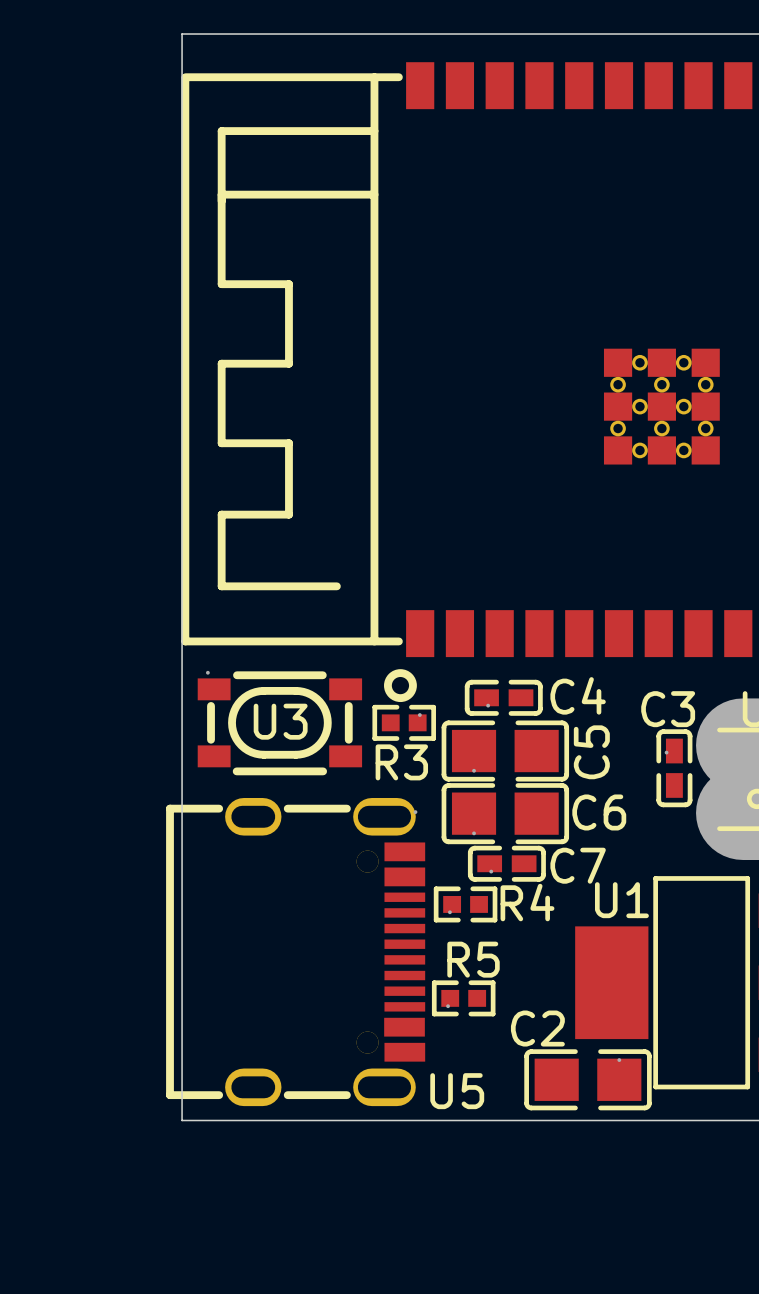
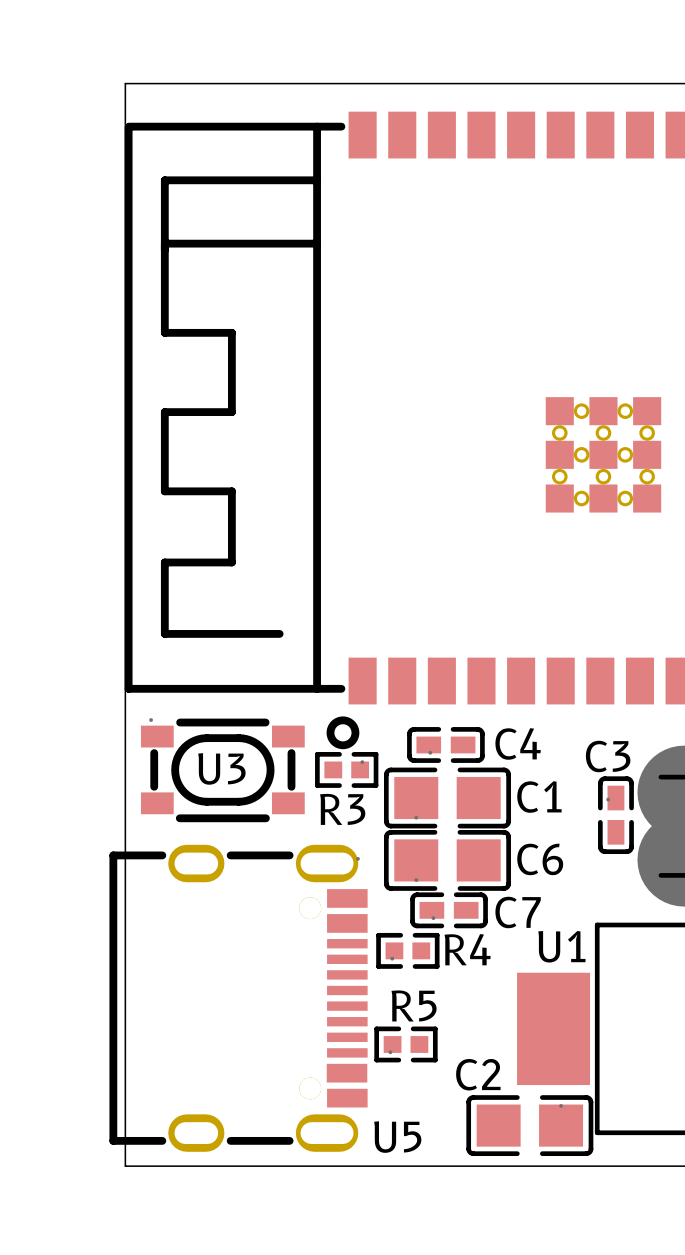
C5 name: C5 (591, 752) -> C1 (539, 797)

